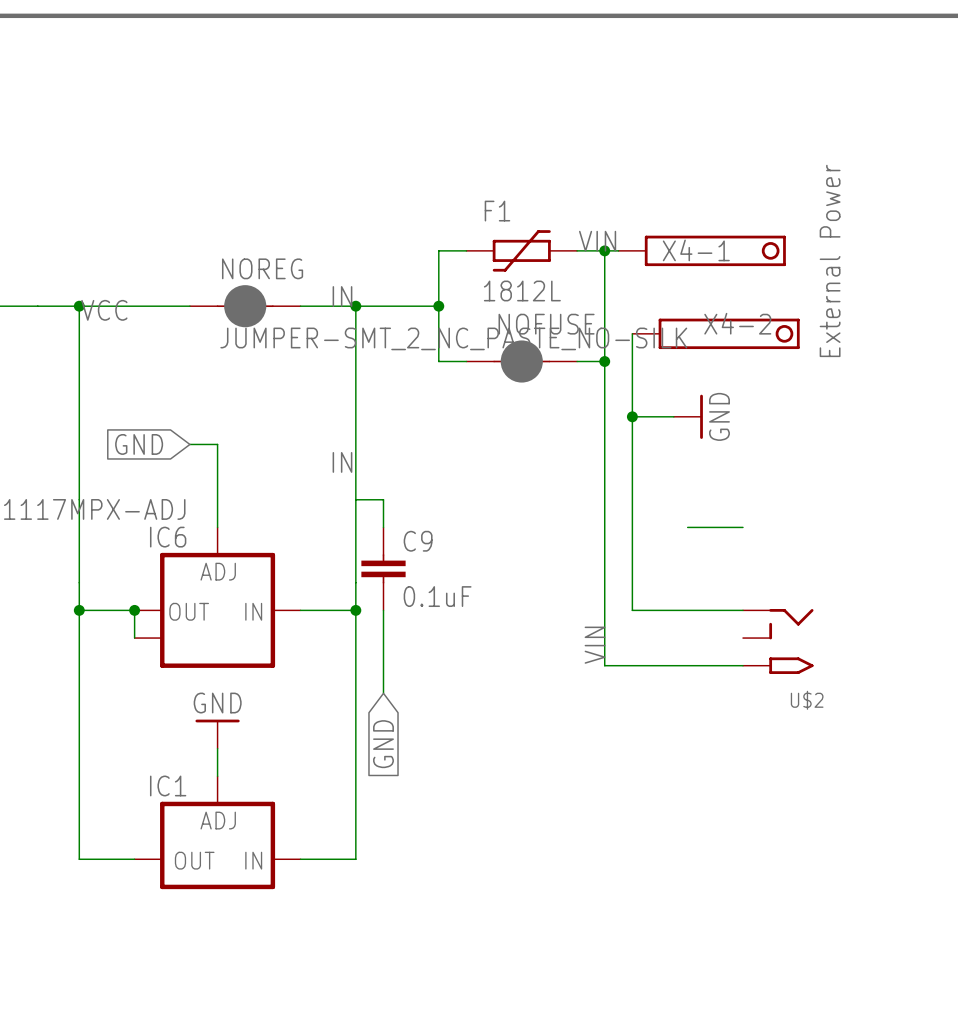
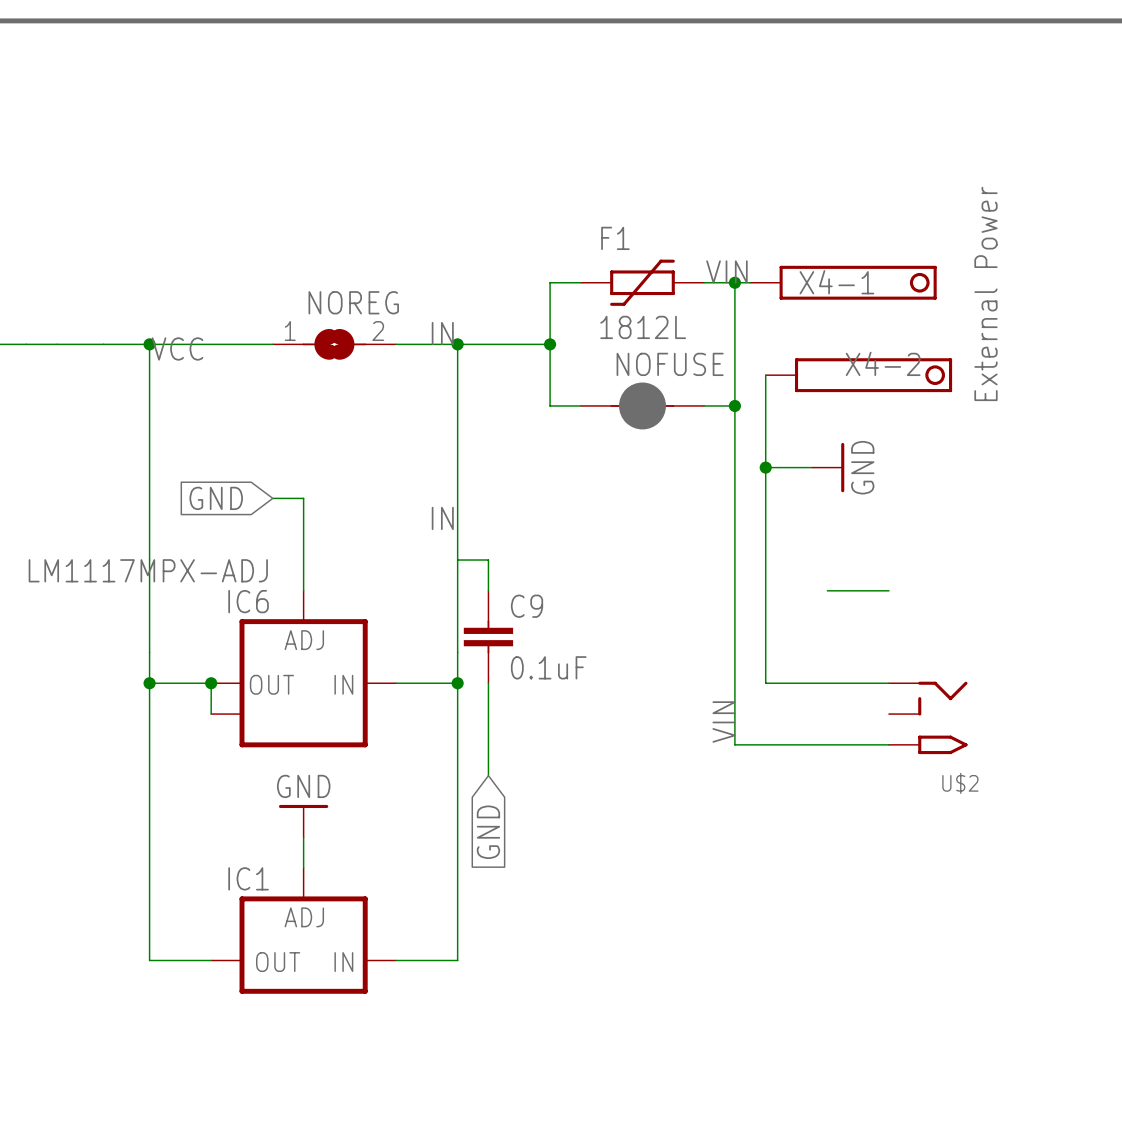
NOREG symbol: [189, 285, 301, 328] -> [272, 328, 397, 360]
NOREG value: JUMPER-SMT_2_NC_PASTE_NO-SILK (453, 338) -> none

